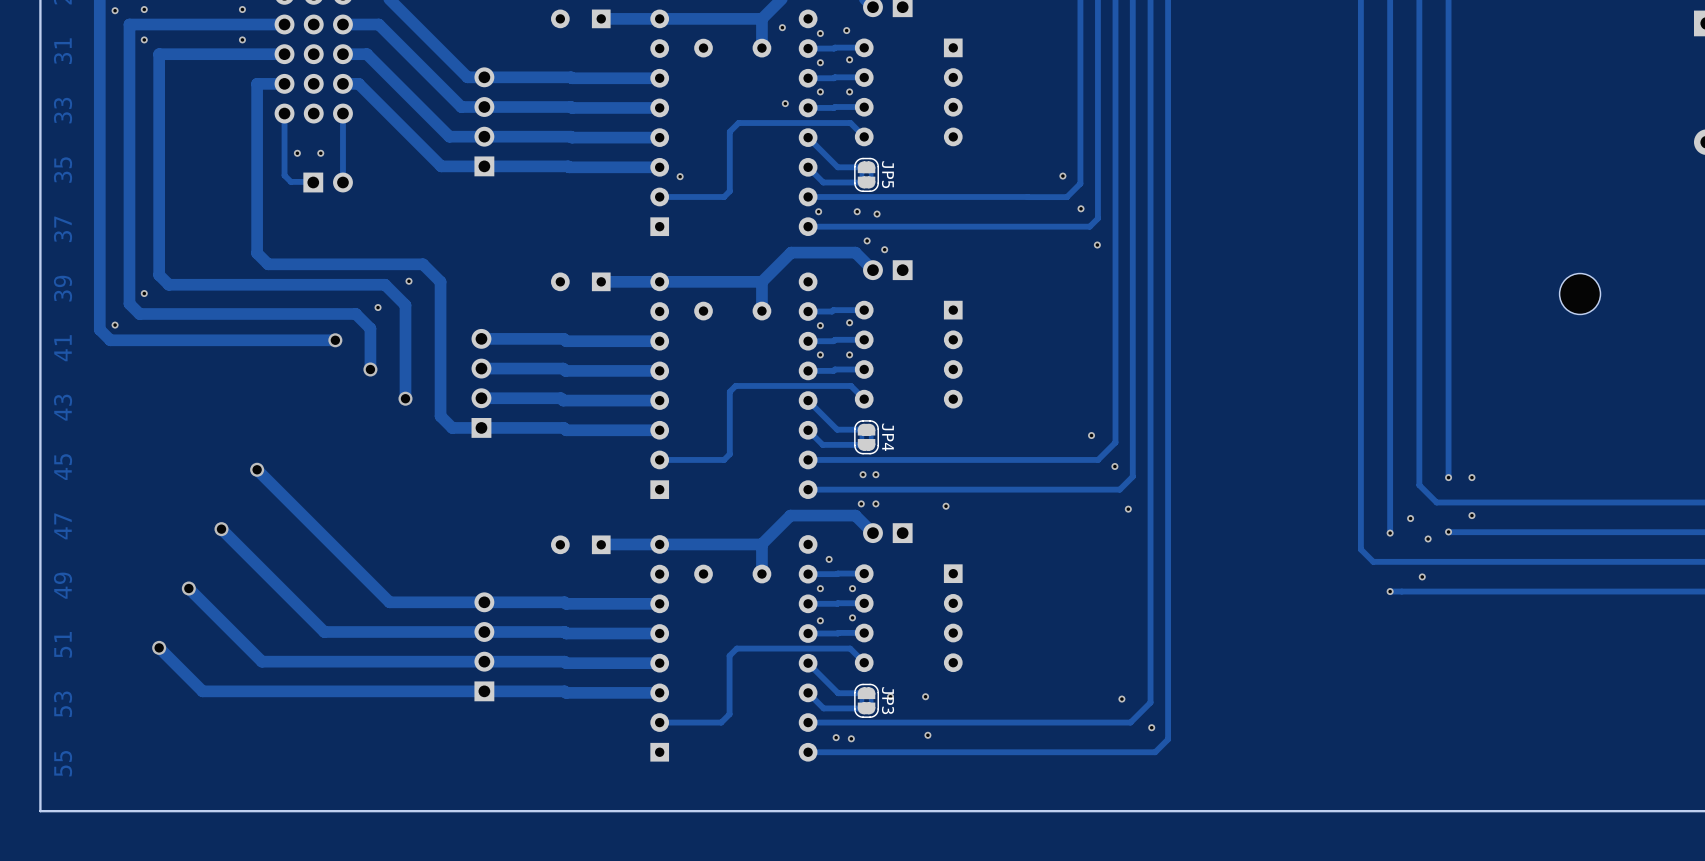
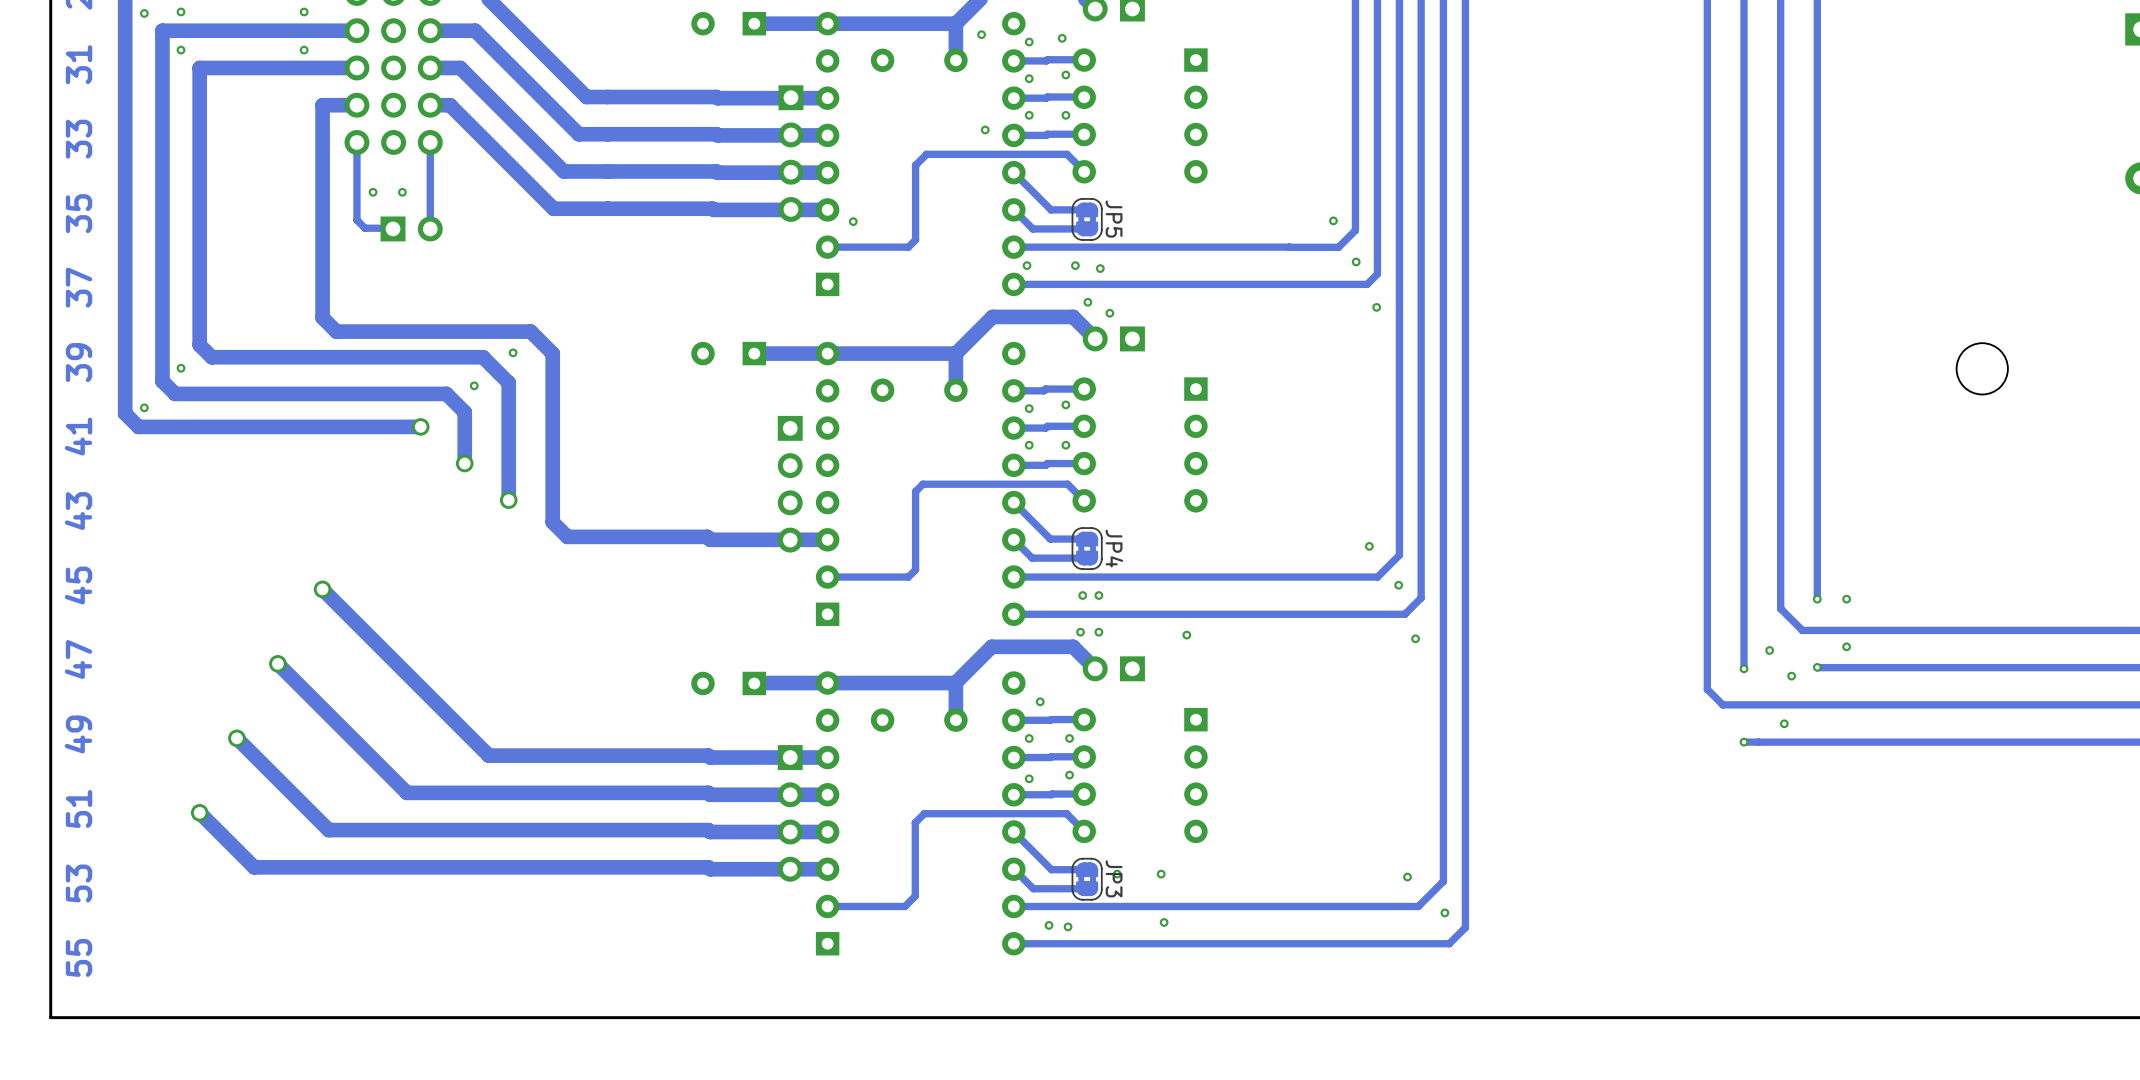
part rotation: 0° (484, 121) -> 180° (790, 153)
part position: (484, 121) -> (790, 153)
track: (481, 338) (659, 341) -> none
track: (481, 368) (659, 370) -> none
part rotation: 0° (481, 383) -> 180° (790, 484)
part position: (481, 383) -> (790, 484)
track: (481, 398) (659, 400) -> none
part rotation: 0° (484, 646) -> 180° (790, 813)
part position: (484, 646) -> (790, 813)

